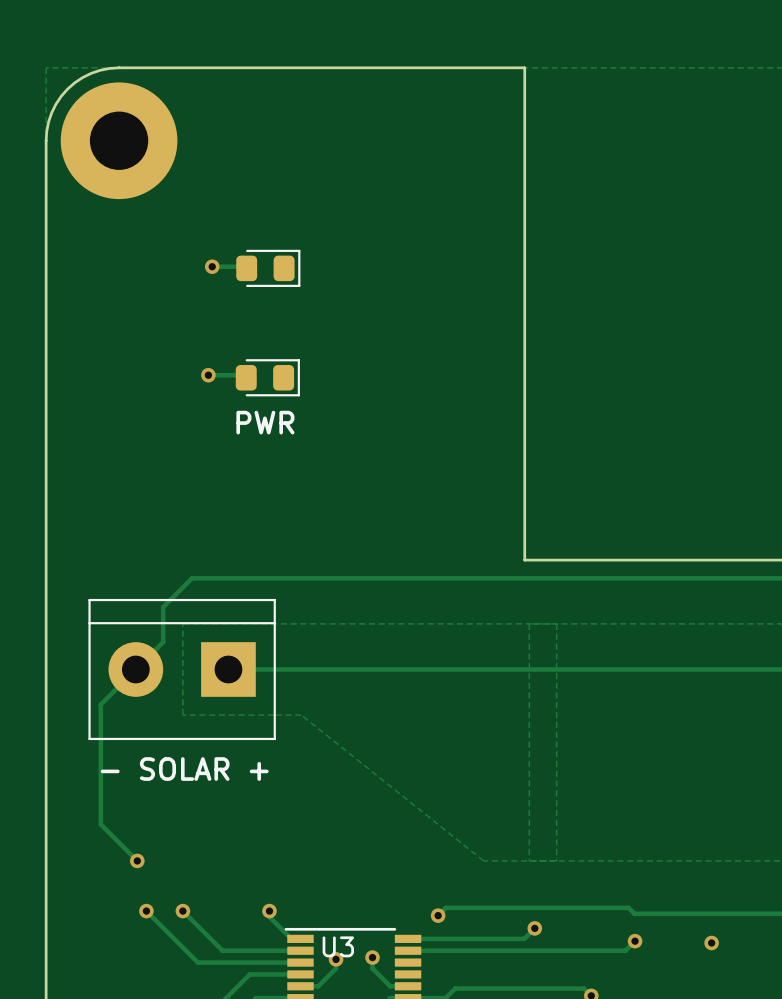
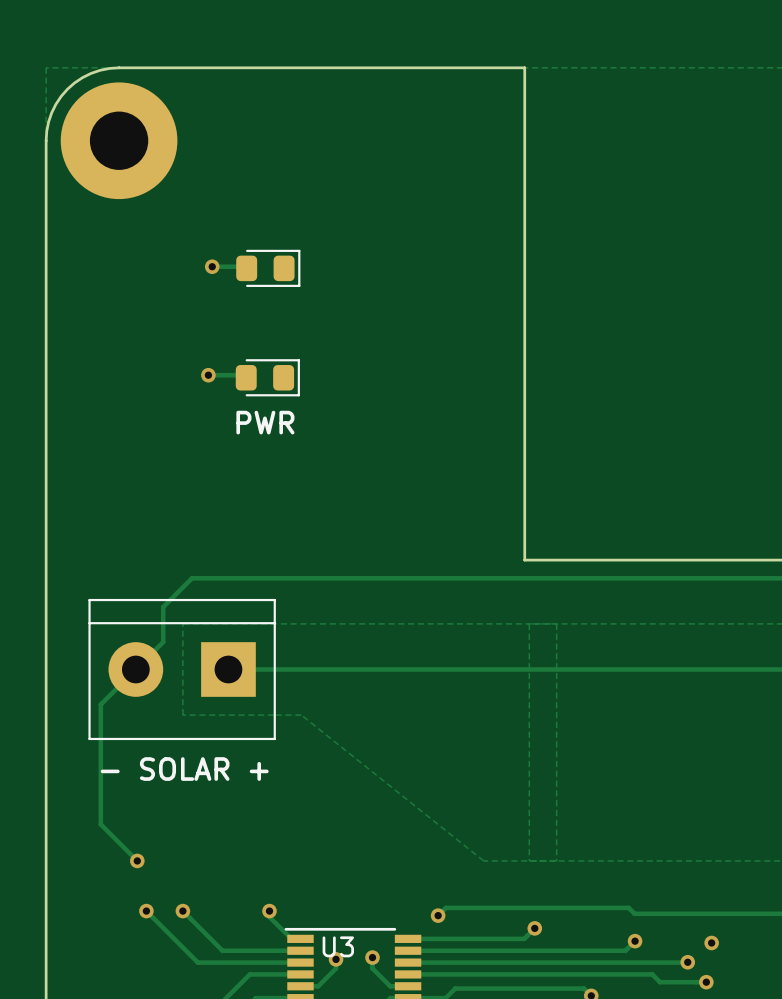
track: none -> (687, 962) (408, 962)
via: none -> (687, 962)
track: none -> (408, 974) (652, 974) (660, 982) (706, 982)
via: none -> (706, 982)

